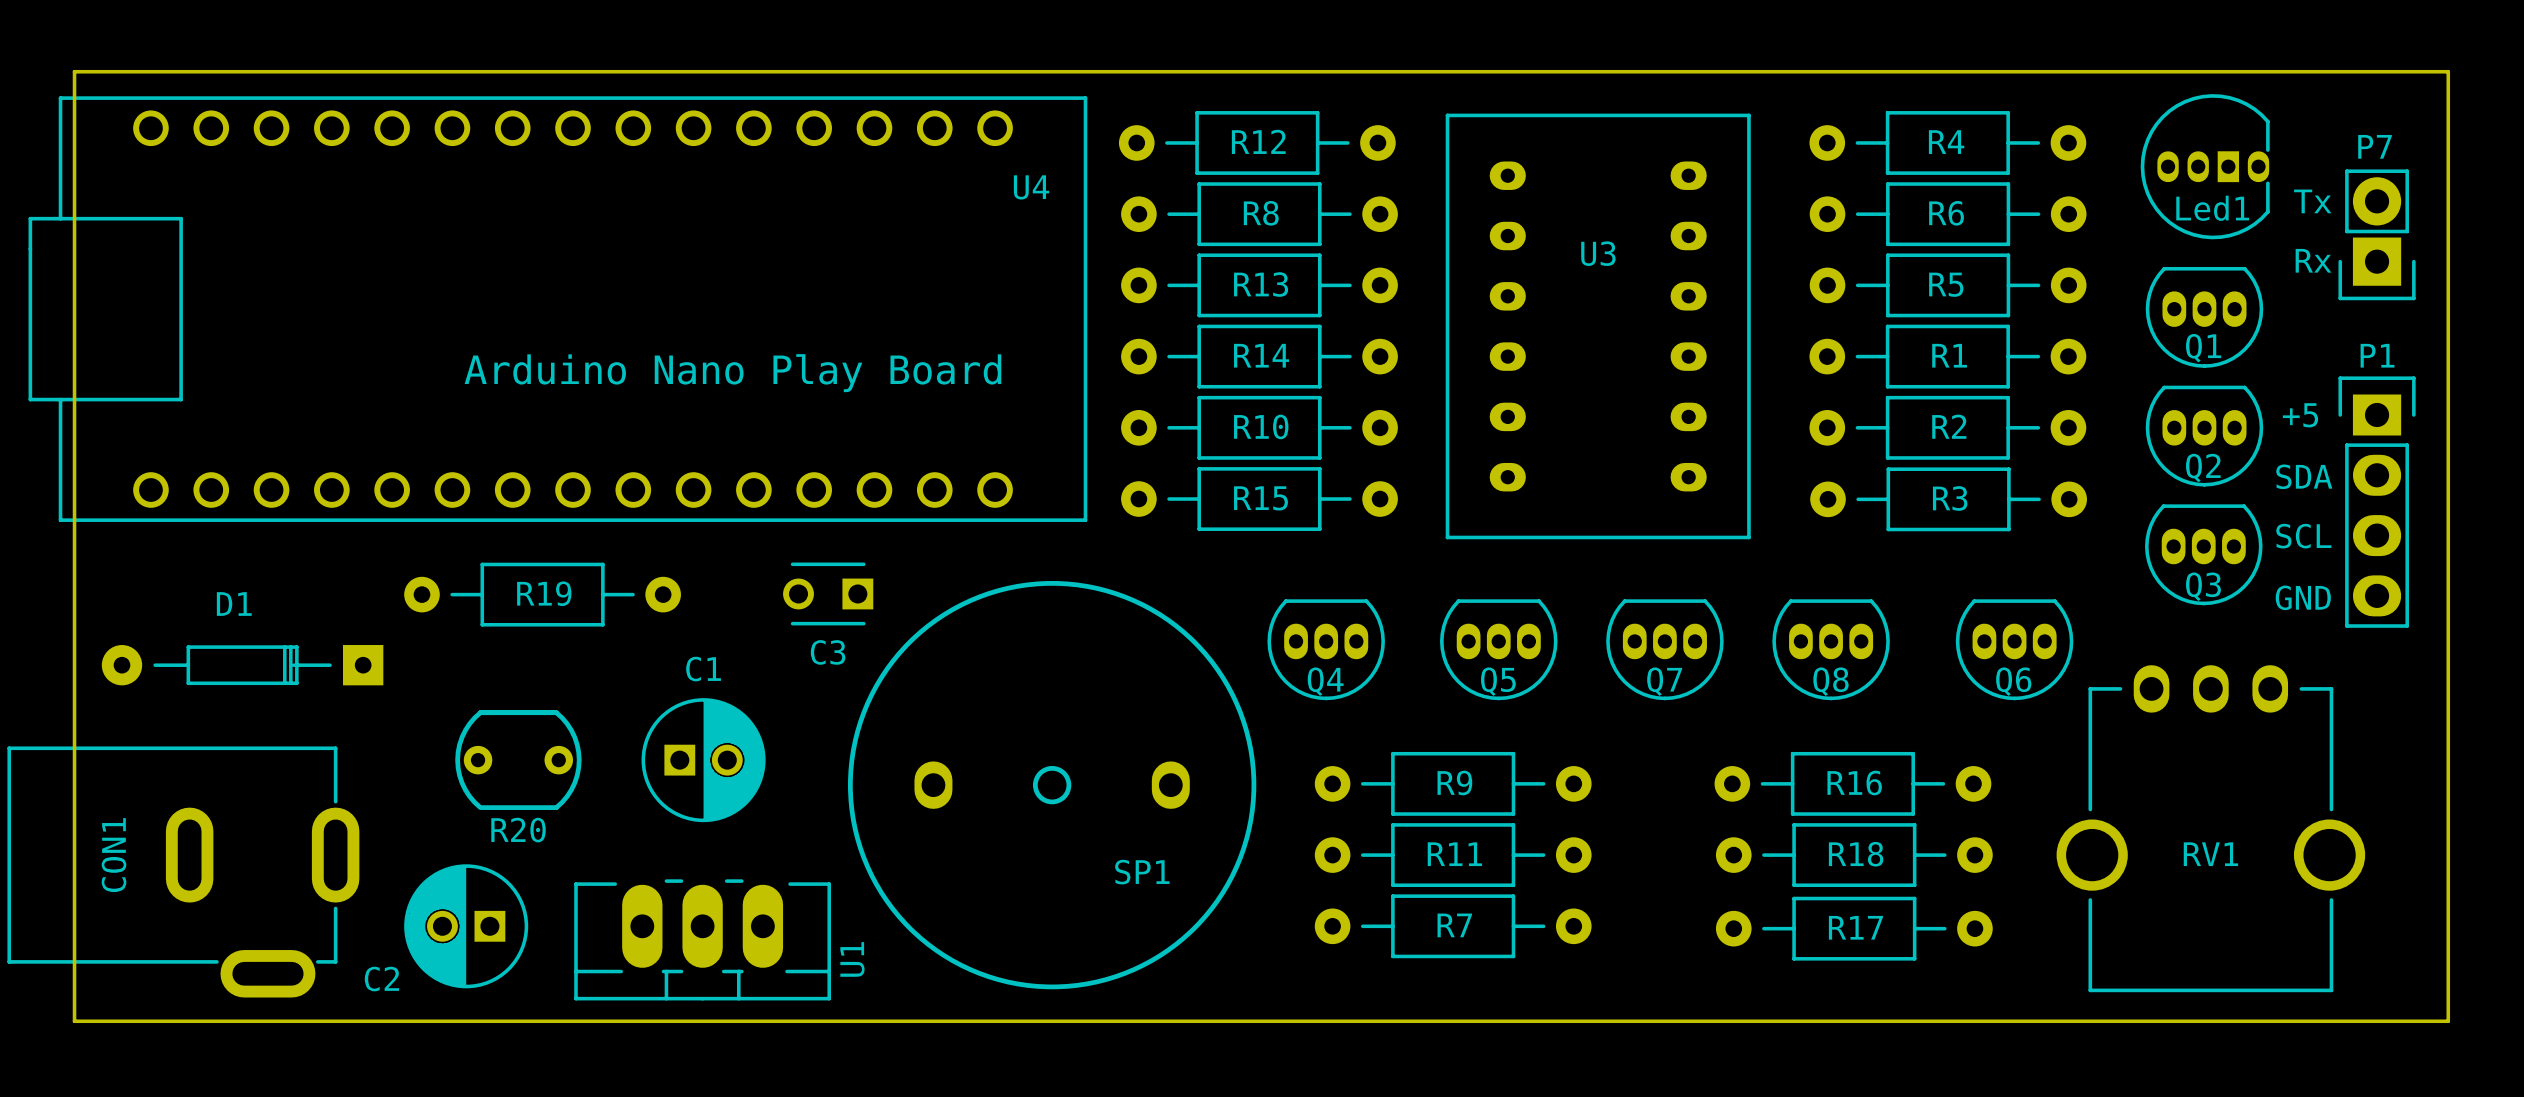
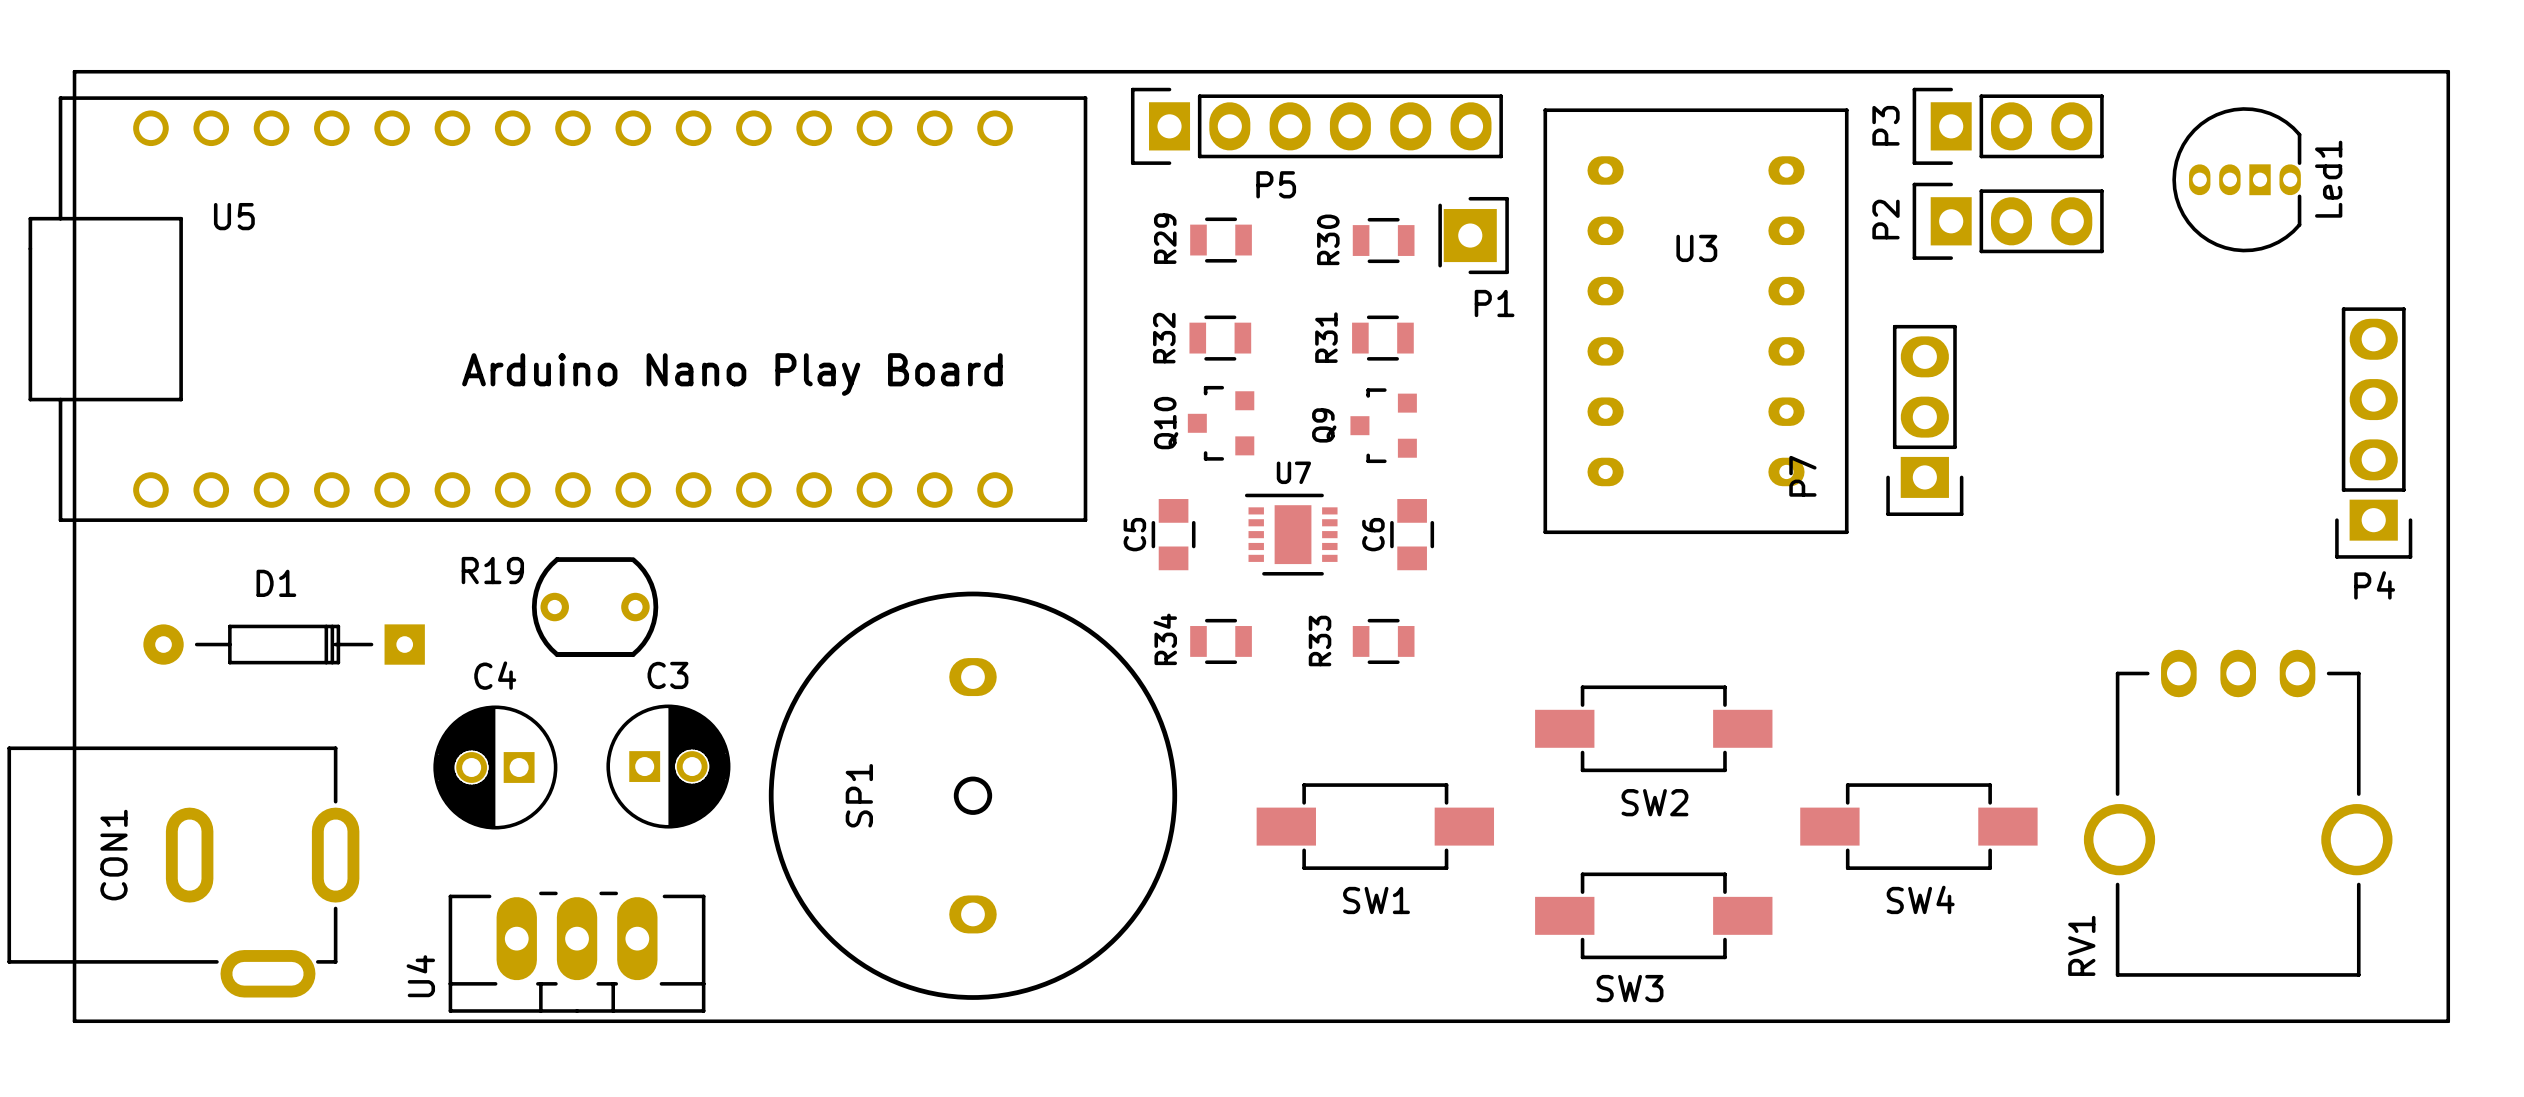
P5: none -> (1316, 126)
P3: none -> (2008, 126)
R12: (1257, 142) -> none
R4: (1947, 142) -> none
P7 name position: P7 (2375, 146) -> P7 (1802, 476)
Led1 position: (2205, 166) -> (2236, 179)
P1 footprint: [2338, 169, 2416, 301] -> [1438, 196, 1509, 275]
U4 name: U4 (1031, 187) -> U5 (234, 216)
text: Tx (2312, 201) -> none
Led1 name rotation: 0° (2212, 208) -> 90° counterclockwise (2328, 179)
R8: (1259, 214) -> none
R6: (1948, 214) -> none
P2: none -> (2008, 221)
R29: none -> (1221, 240)
R30: none -> (1383, 240)
text: Rx (2313, 260) -> none
R13: (1259, 285) -> none
R5: (1948, 285) -> none
Q1: (2204, 317) -> none
U3 position: (1598, 326) -> (1696, 321)
R32: none -> (1220, 338)
R31: none -> (1382, 338)
P1 name position: P1 (2377, 355) -> P1 (1494, 303)
R14: (1259, 356) -> none
R1: (1947, 356) -> none
P7 footprint: [2338, 376, 2416, 628] -> [1886, 324, 1964, 517]
text: +5 (2300, 415) -> none
Q10: none -> (1221, 423)
Q9: none -> (1383, 425)
R10: (1259, 427) -> none
R2: (1947, 427) -> none
P4: none -> (2373, 433)
Q2: (2204, 436) -> none
text: SDA (2304, 476) -> none
R15: (1259, 499) -> none
R3: (1948, 499) -> none
C5: none -> (1173, 534)
U7: none -> (1291, 534)
C6: none -> (1412, 534)
text: SCL (2303, 536) -> none
Q3: (2203, 554) -> none
R19 footprint: [404, 562, 681, 627] -> [531, 557, 659, 658]
C3 footprint: [783, 562, 874, 626] -> [606, 704, 731, 829]
R19 name position: R19 (544, 593) -> R19 (492, 570)
text: GND (2303, 597) -> none
R34: none -> (1221, 641)
R33: none -> (1383, 641)
Q4: (1326, 649) -> none
Q5: (1498, 649) -> none
Q7: (1664, 649) -> none
Q8: (1831, 649) -> none
Q6: (2014, 649) -> none
C3 name position: C3 (828, 652) -> C3 (667, 675)
D1 position: (242, 665) -> (284, 644)
SW2: none -> (1653, 728)
R20: (518, 760) -> none
C1: (703, 760) -> none
C4: none -> (495, 767)
R9: (1453, 783) -> none
R16: (1852, 783) -> none
SP1 rotation: 0° (1052, 785) -> 90° clockwise (972, 795)
SW1: none -> (1375, 826)
SW4: none -> (1918, 826)
RV1 position: (2210, 828) -> (2238, 813)
RV1 name rotation: 0° (2210, 854) -> 90° counterclockwise (2081, 945)
RV1 name position: RV1 (2210, 854) -> RV1 (2081, 945)
R11: (1453, 855) -> none
R18: (1854, 855) -> none
SP1 name position: SP1 (1142, 872) -> SP1 (859, 795)
SW3: none -> (1653, 915)
C2: (466, 926) -> none
R7: (1453, 926) -> none
R17: (1854, 928) -> none
U1: (702, 939) -> none
U4: none -> (577, 952)

